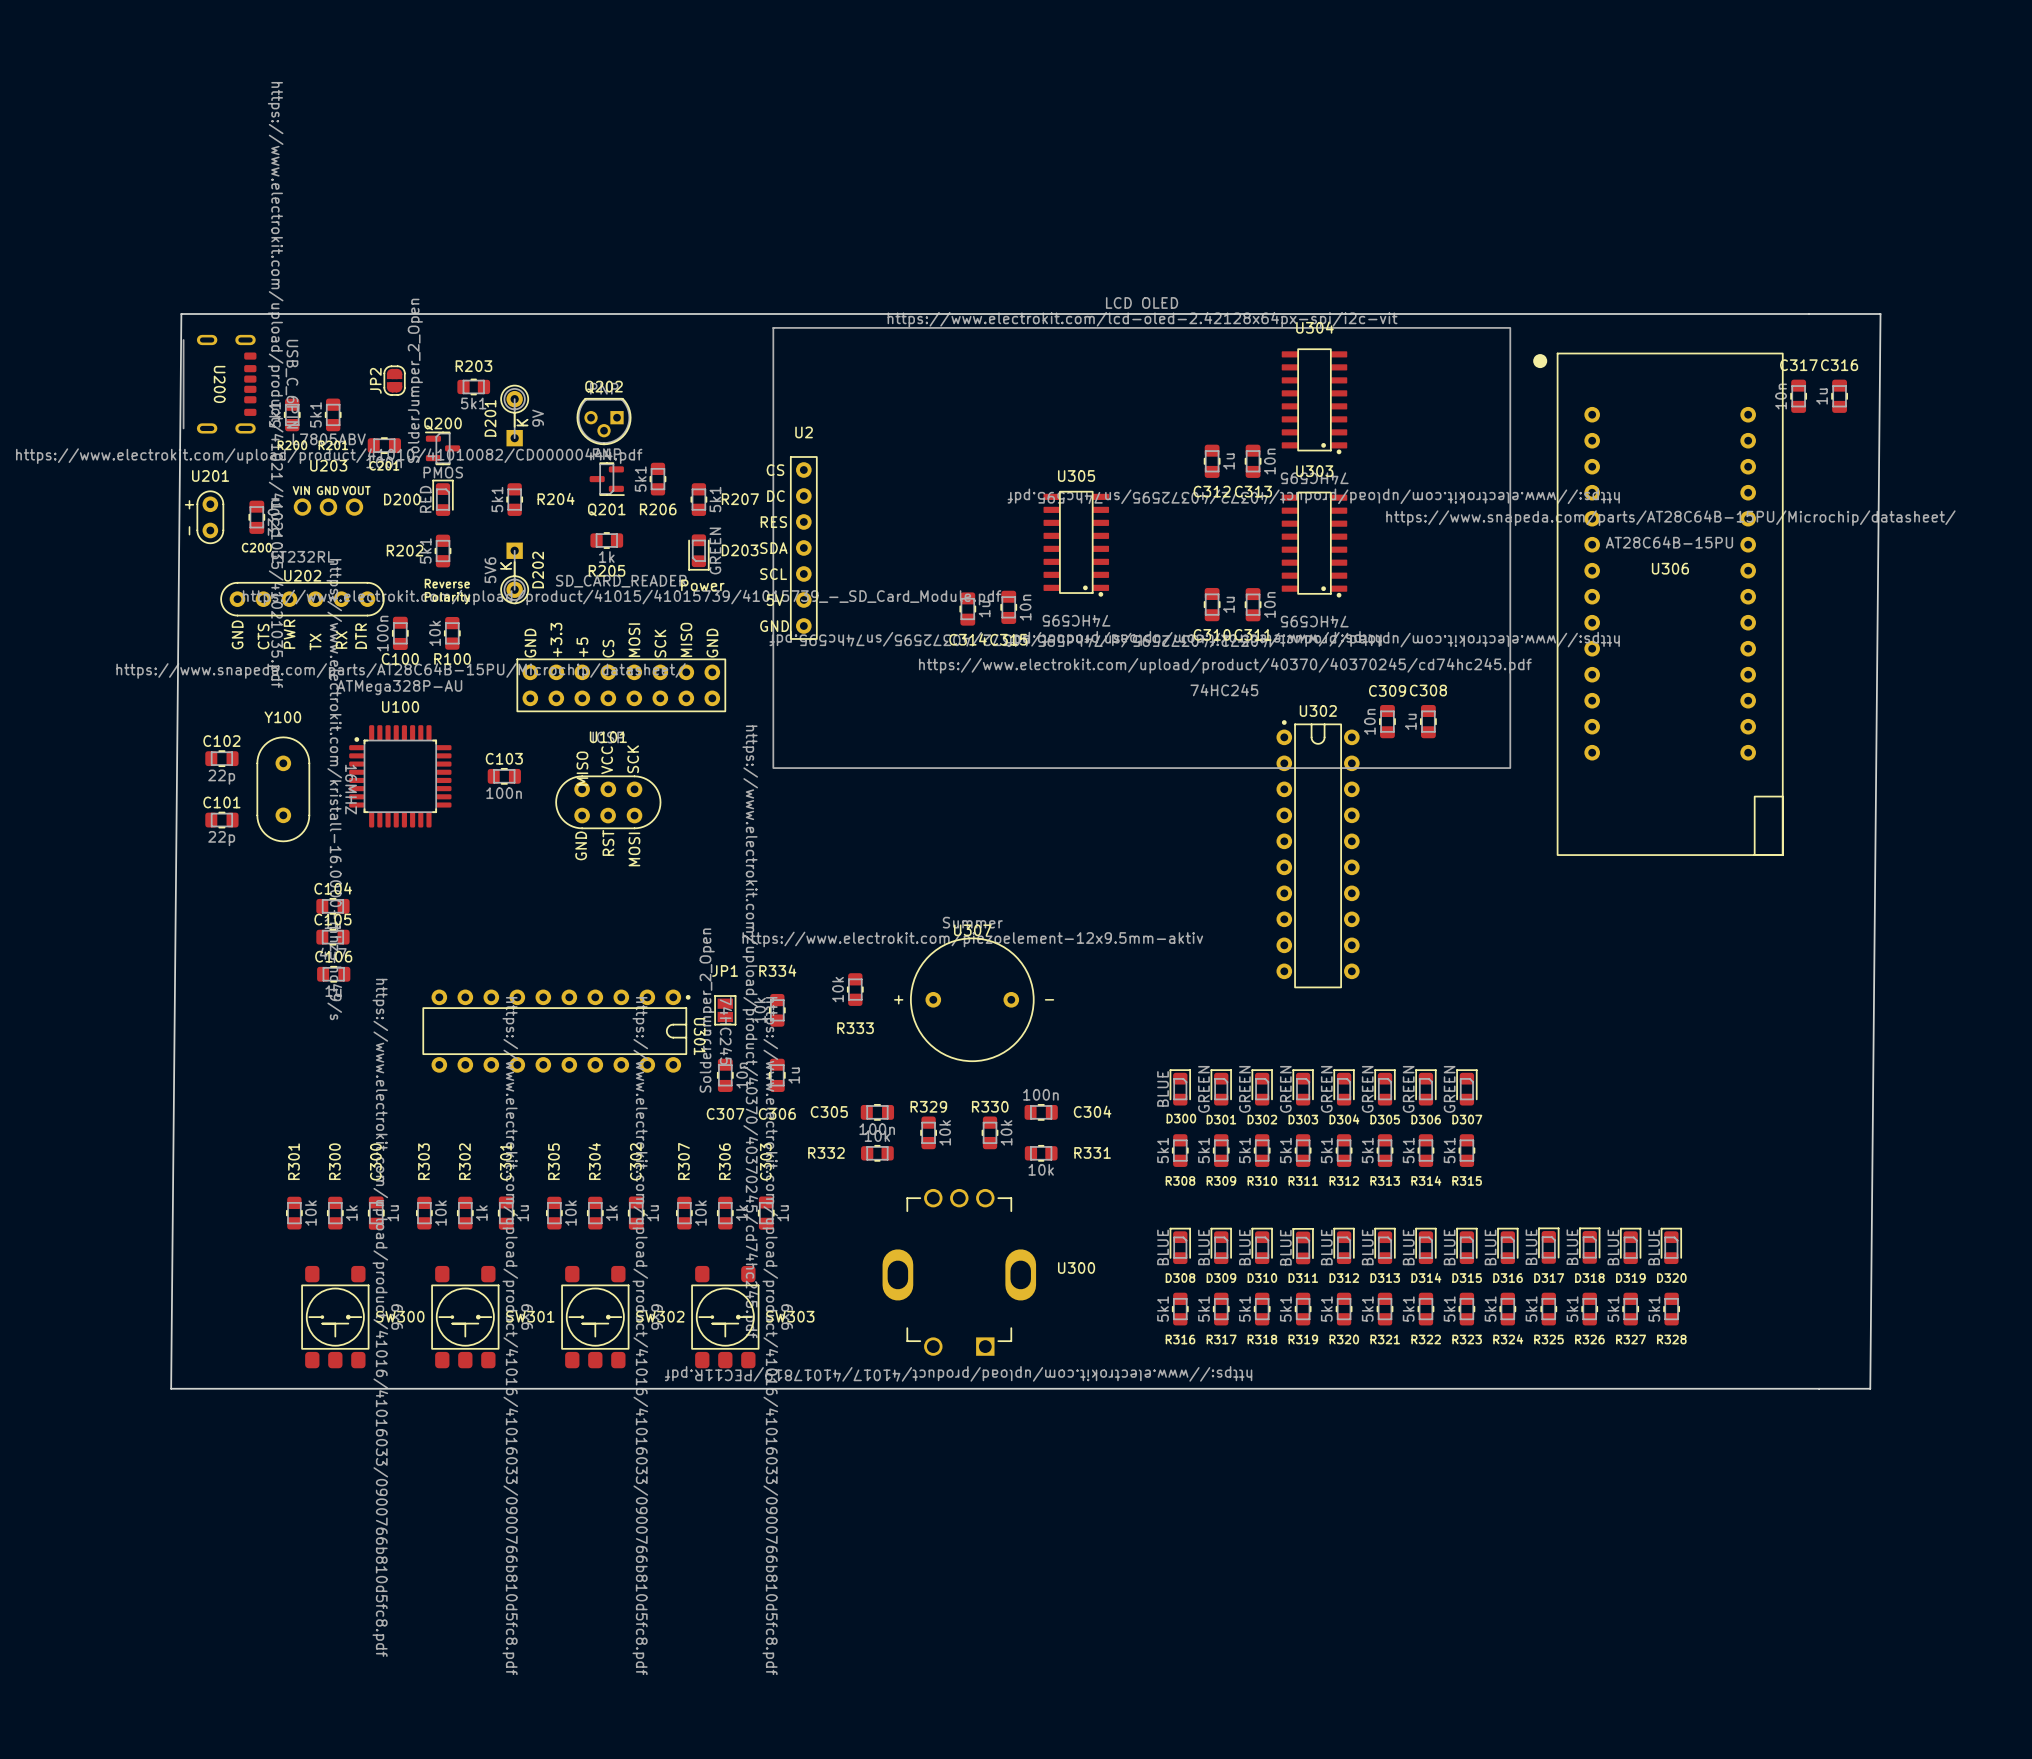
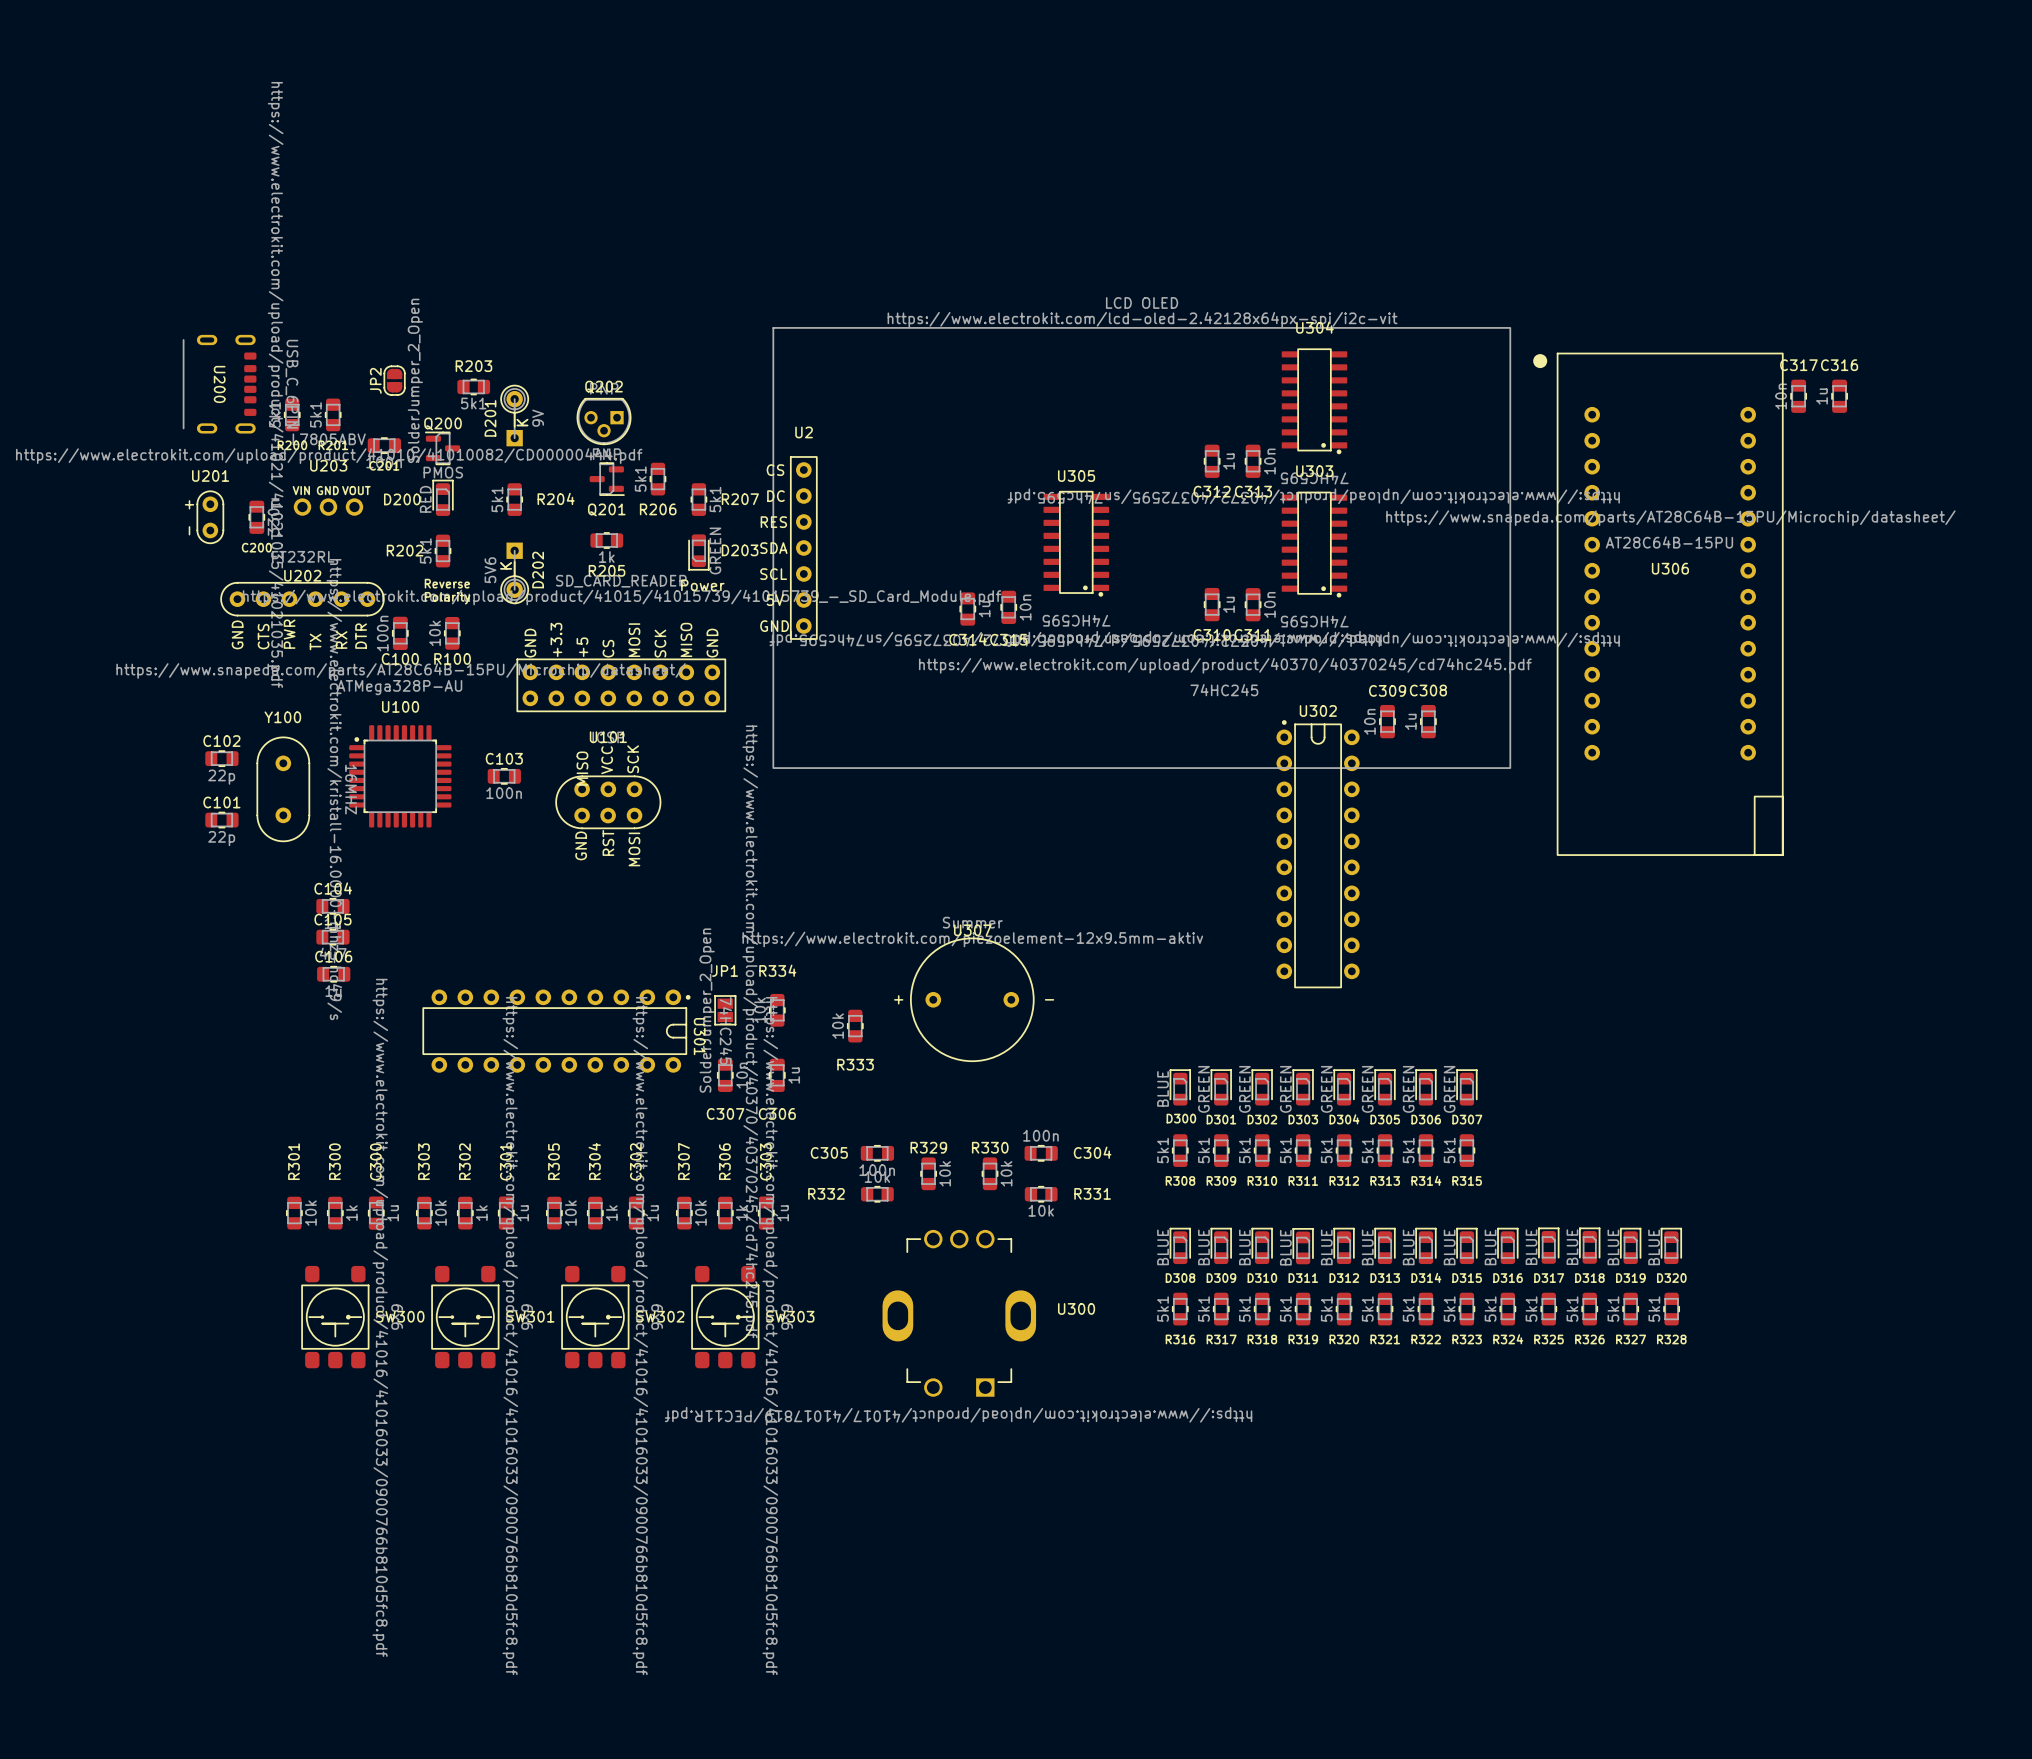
board edge: (181, 314) (171, 1388) (1870, 1388) (1880, 314) (181, 314) -> none
R333 position: (855, 989) -> (855, 1026)
C305 position: (877, 1112) -> (877, 1153)
C304 position: (1041, 1112) -> (1041, 1153)
R329 position: (928, 1132) -> (928, 1173)
R330 position: (990, 1132) -> (990, 1173)
R332 position: (877, 1153) -> (877, 1194)
R331 position: (1041, 1153) -> (1041, 1194)
U300 position: (959, 1272) -> (959, 1313)

